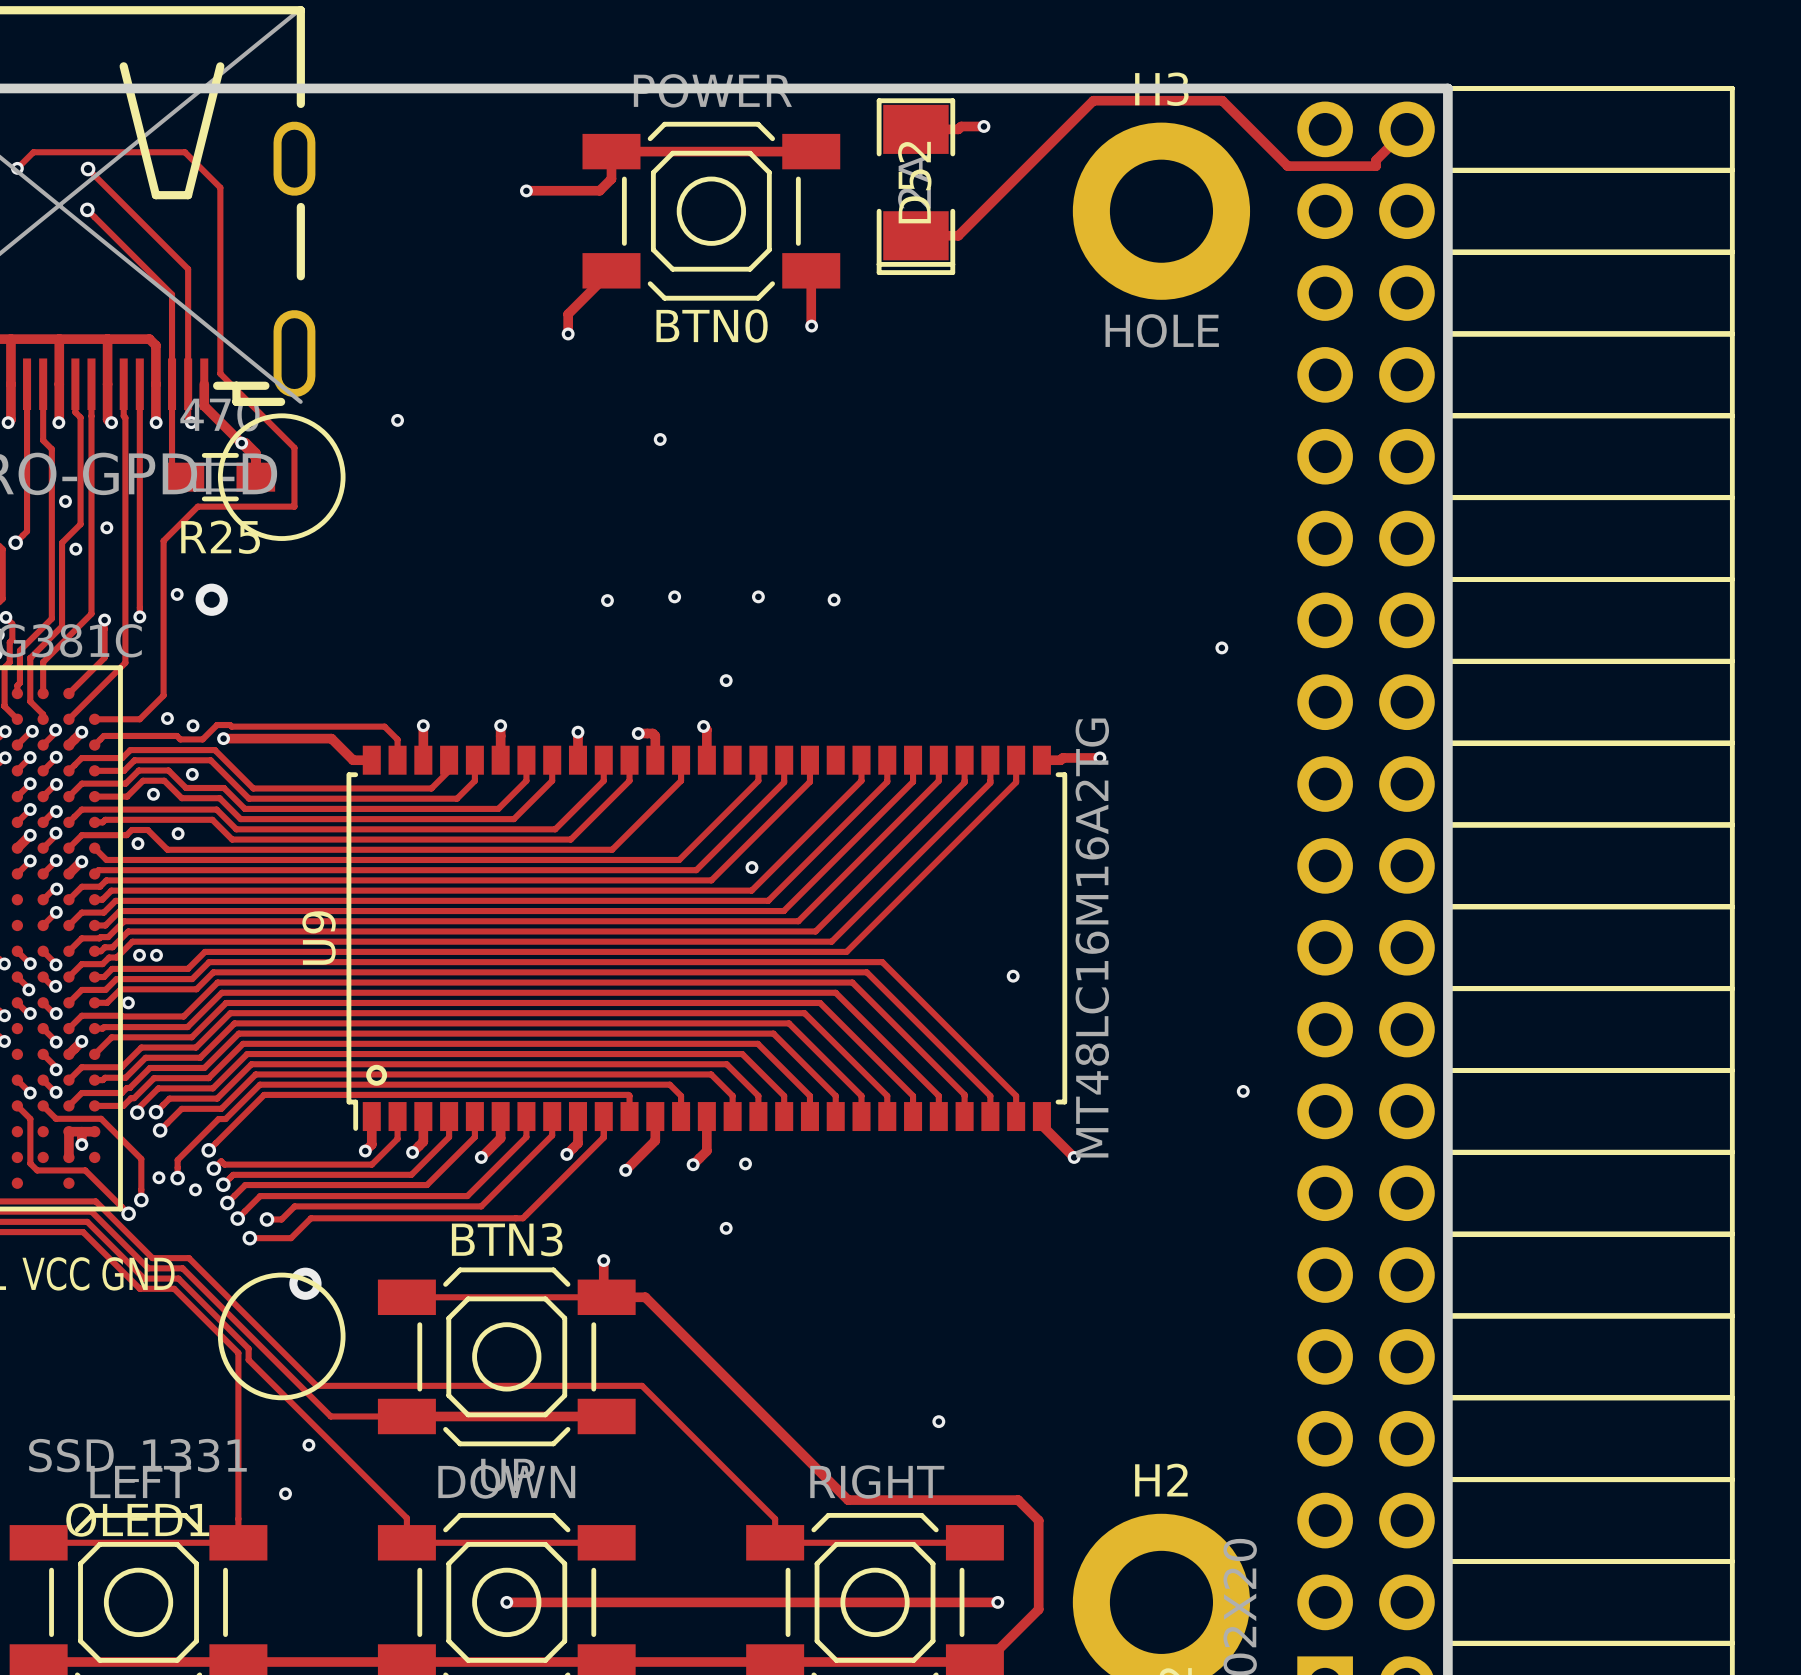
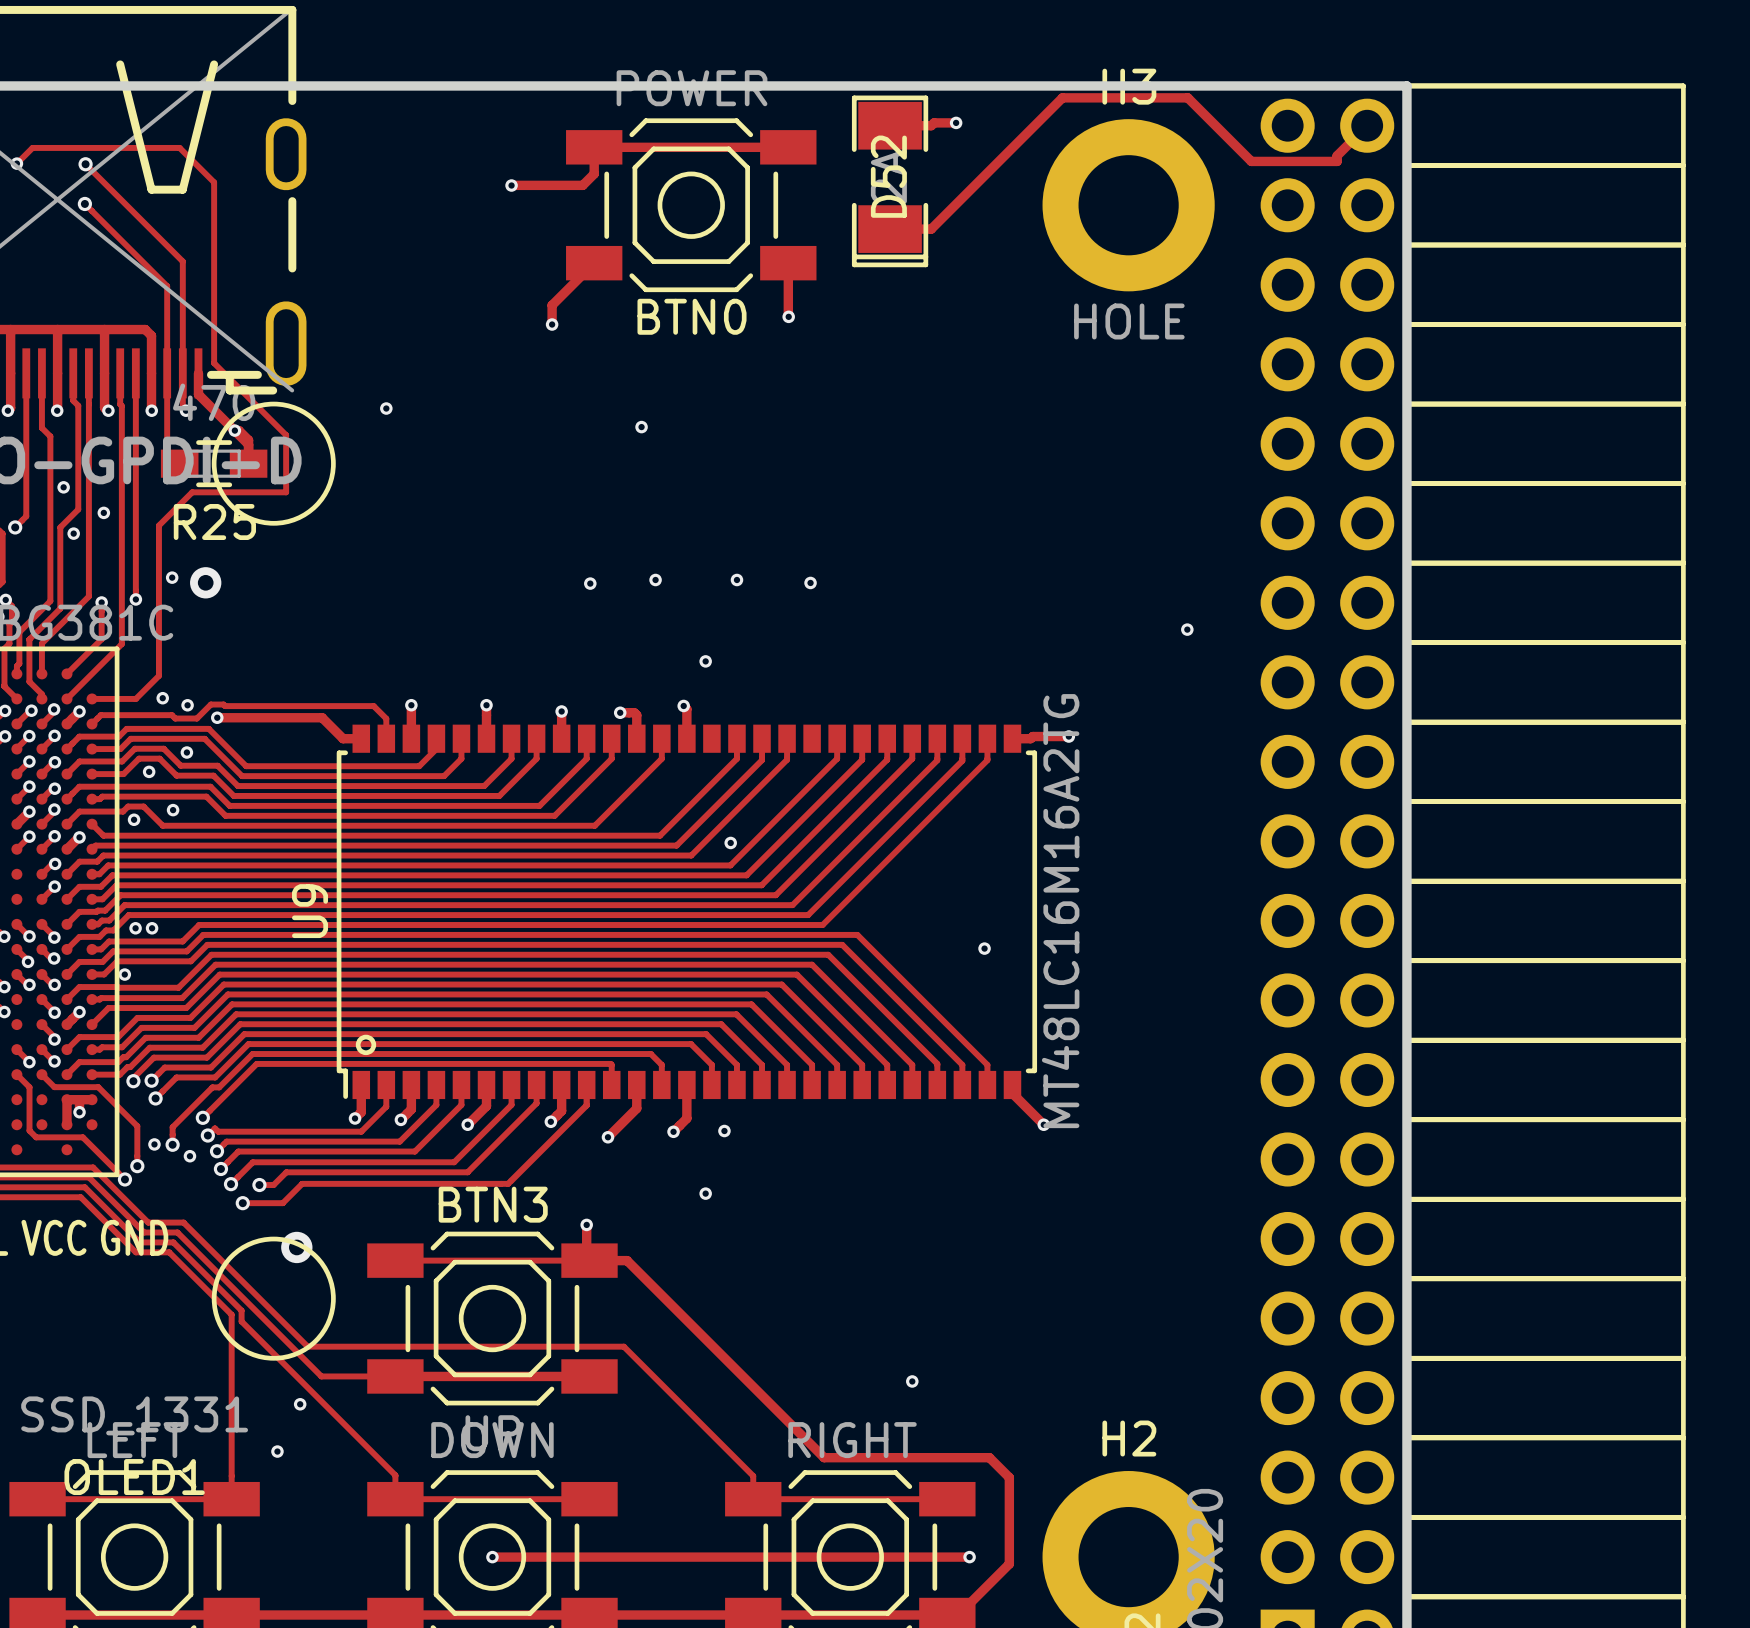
via: (1243, 1091) -> none

